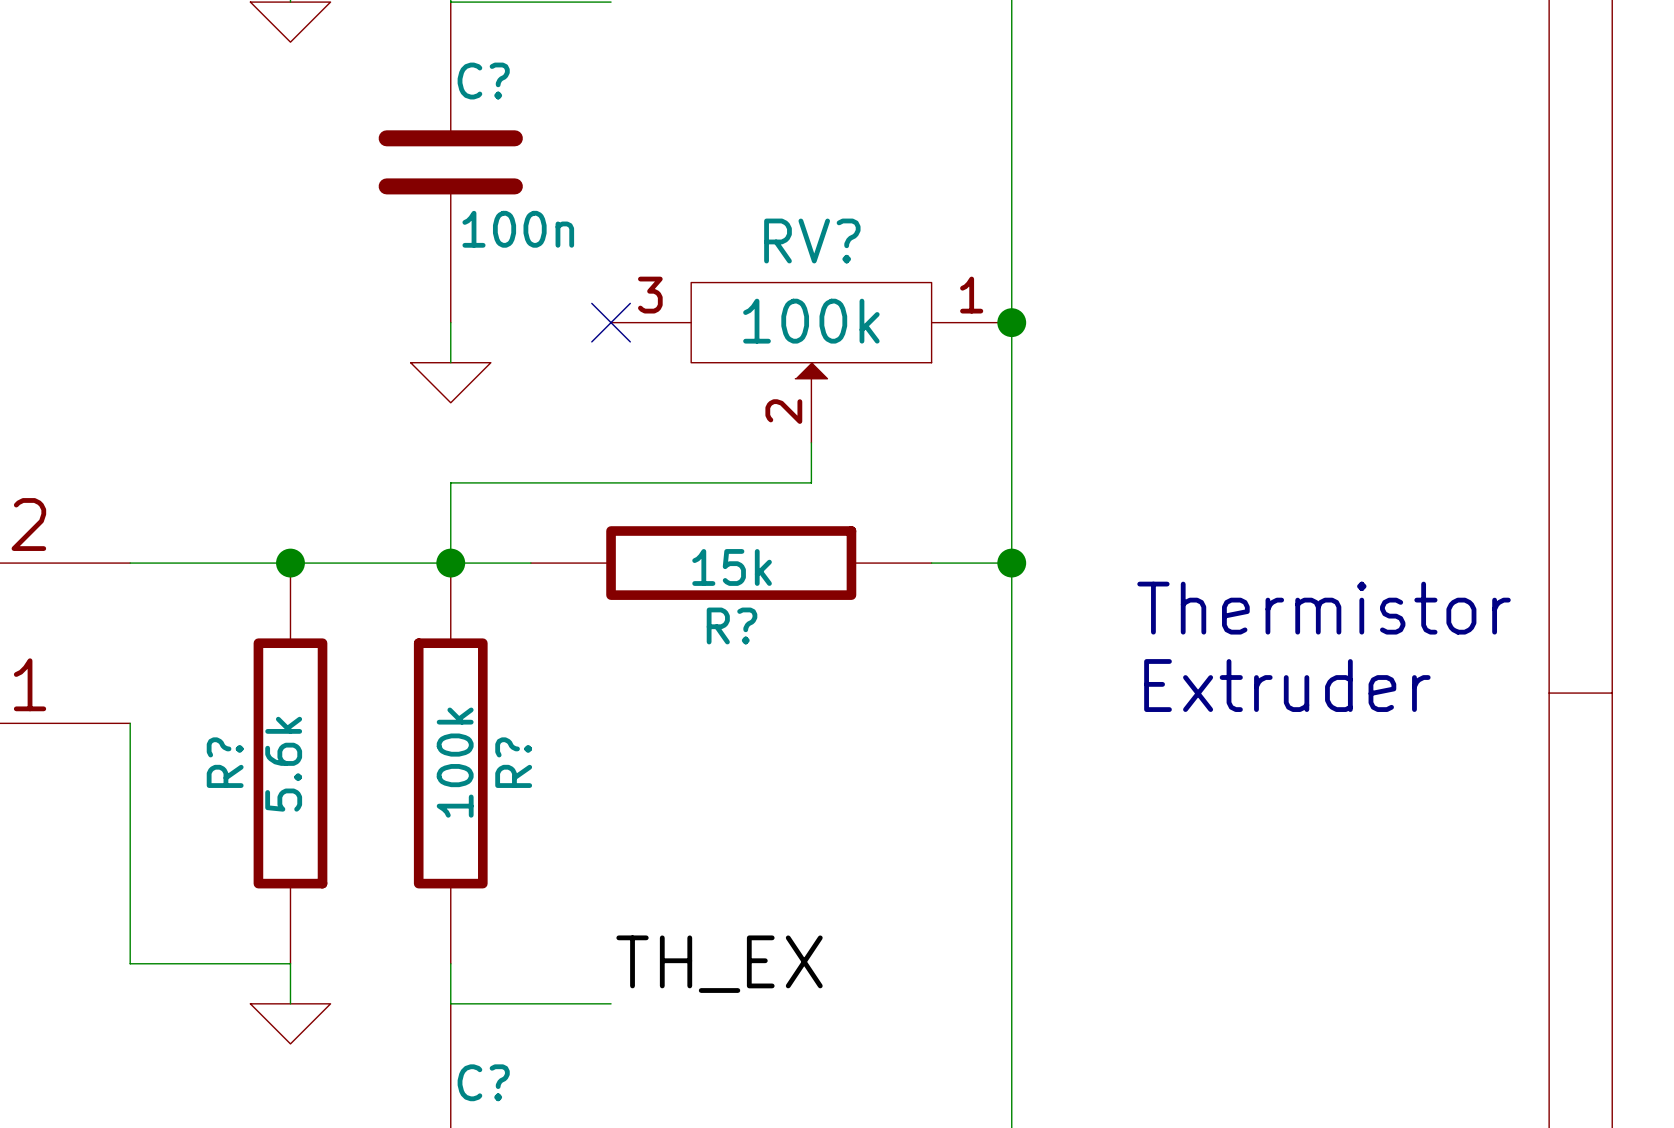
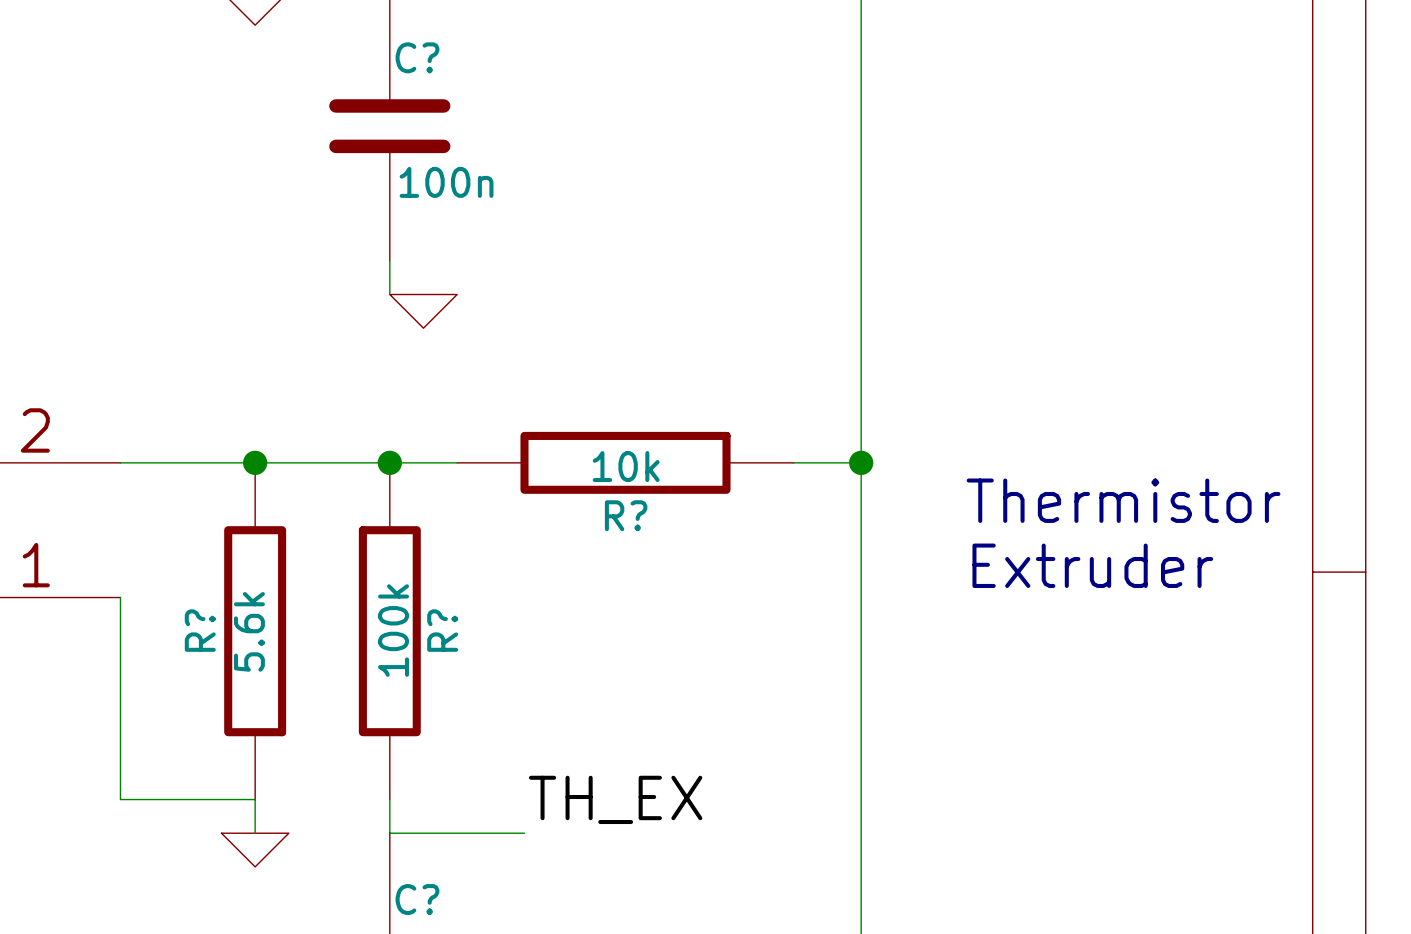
no-connect mark: (611, 322) -> none
junction: (1011, 322) -> none
RV?: 100k (811, 362) -> none
power symbol position: (450, 382) -> (423, 311)
wire: (811, 442) (811, 482) (450, 482) (450, 563) -> none
R? value: 15k (732, 567) -> 10k (626, 466)

